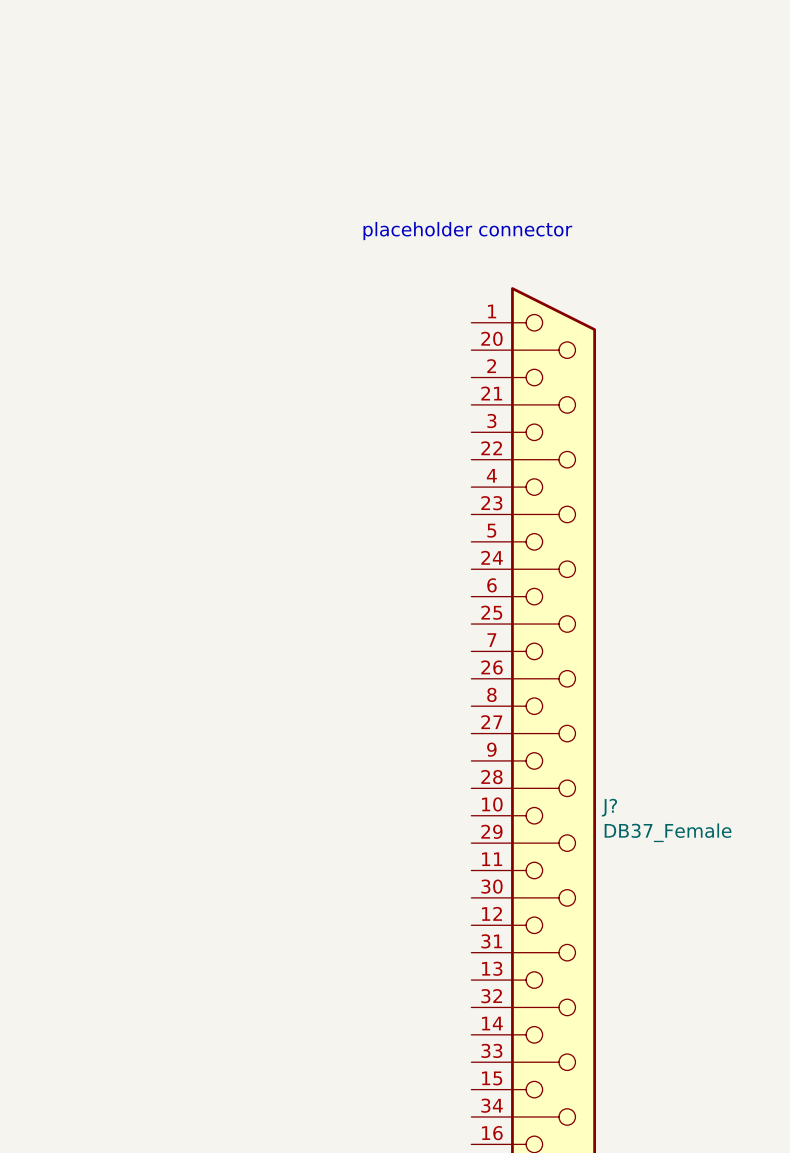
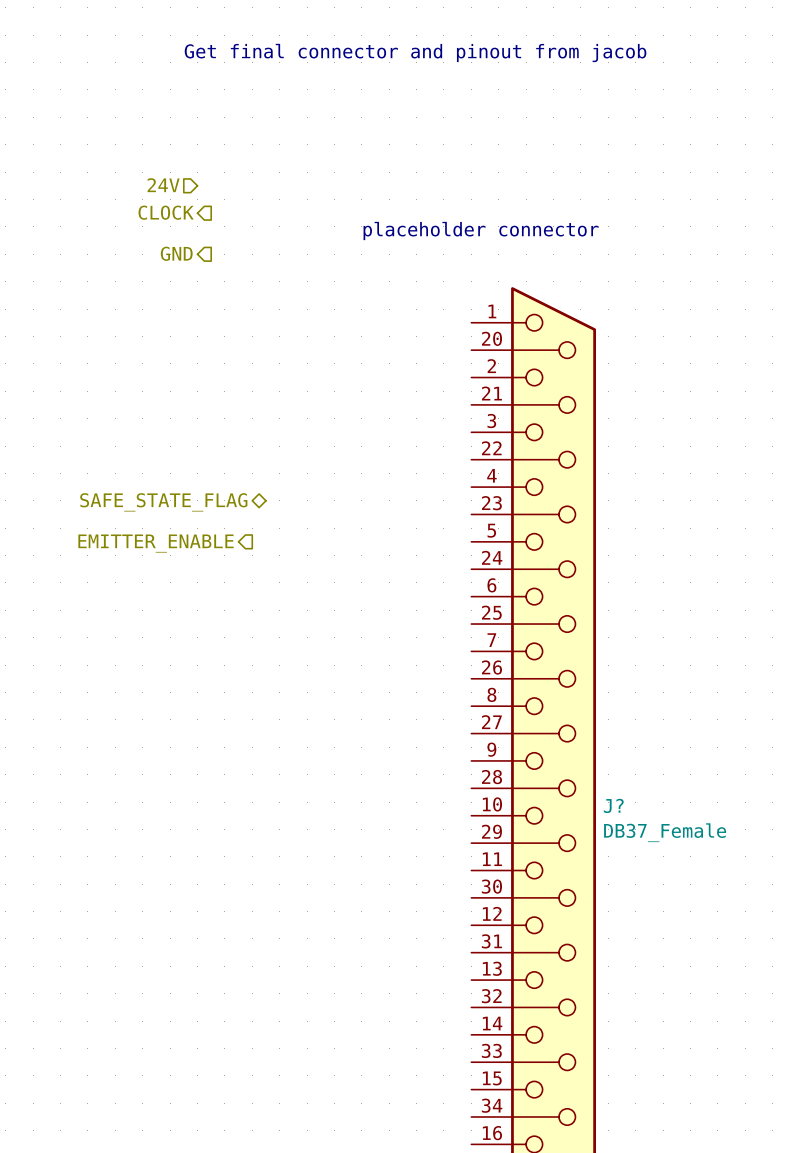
text: none -> Get final connector and pinout from jacob (415, 52)
hierarchical label: none -> 24V (163, 185)
hierarchical label: none -> CLOCK (166, 212)
hierarchical label: none -> GND (176, 253)
hierarchical label: none -> SAFE_STATE_FLAG (163, 502)
hierarchical label: none -> EMITTER_ENABLE (156, 543)

